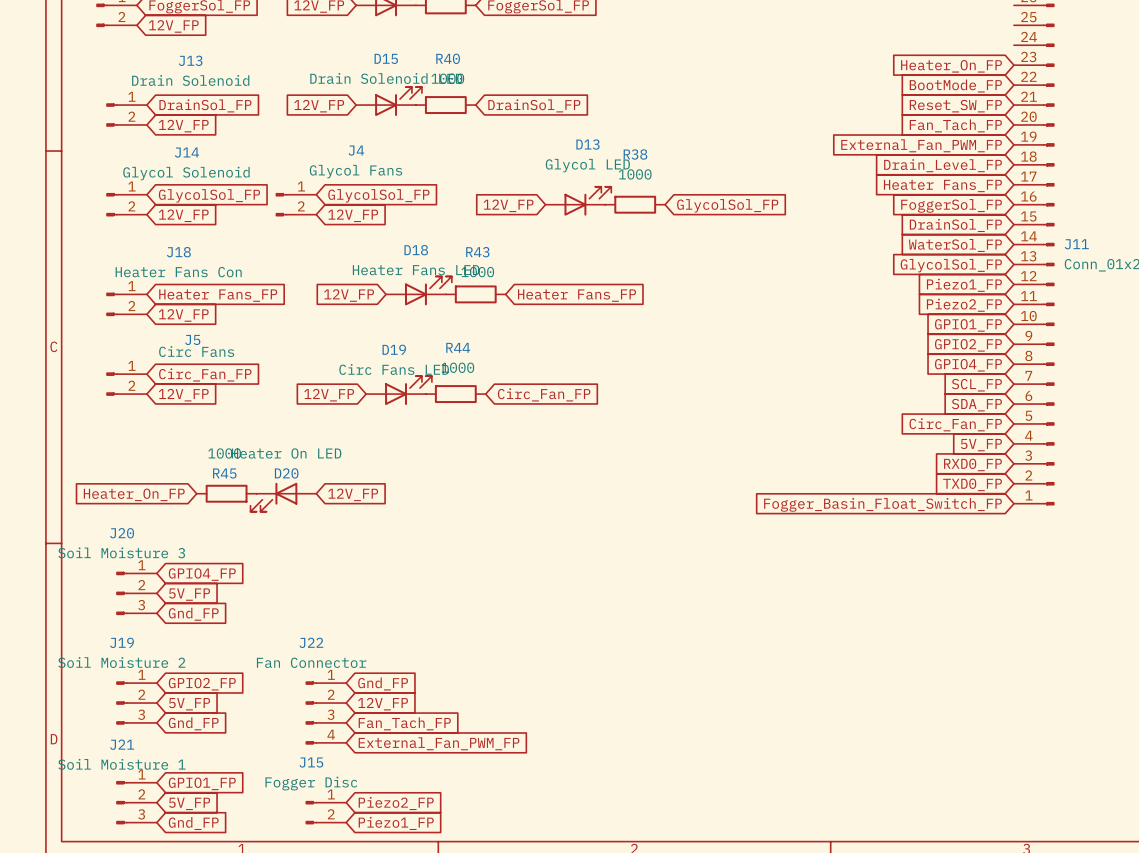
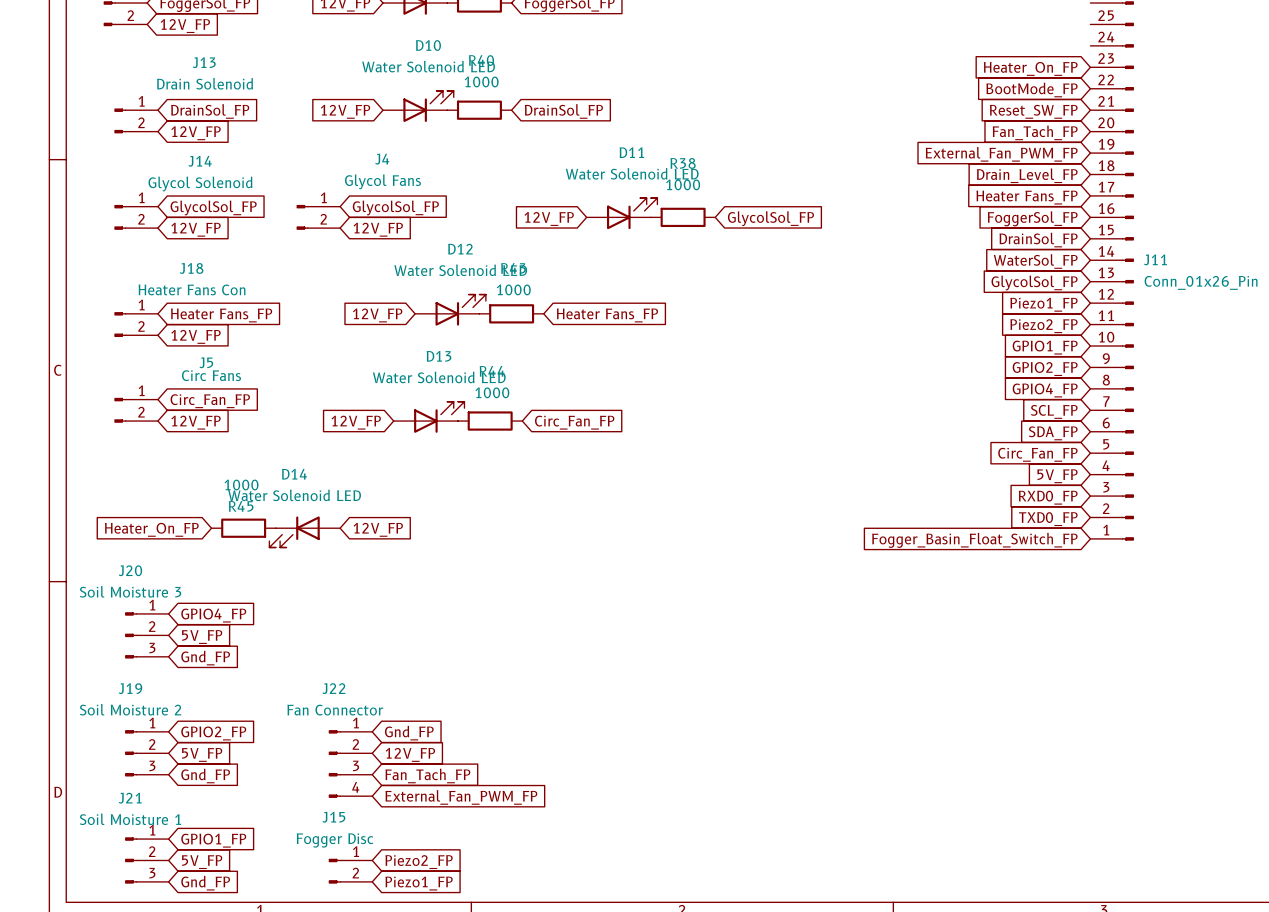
D15 name: D15 (386, 58) -> D10 (428, 45)
D15 value: Drain Solenoid LED (386, 78) -> Water Solenoid LED (428, 66)
D13 name: D13 (587, 144) -> D11 (631, 152)
D13 value: Glycol LED (587, 165) -> Water Solenoid LED (632, 173)
D18 name: D18 (416, 250) -> D12 (460, 249)
D18 value: Heater Fans LED (416, 270) -> Water Solenoid LED (460, 270)
D19 name: D19 (394, 349) -> D13 (439, 356)
D19 value: Circ Fans LED (394, 369) -> Water Solenoid LED (439, 377)
D20 value: Heater On LED (286, 453) -> Water Solenoid LED (294, 495)
D20 name: D20 (286, 473) -> D14 (294, 474)

